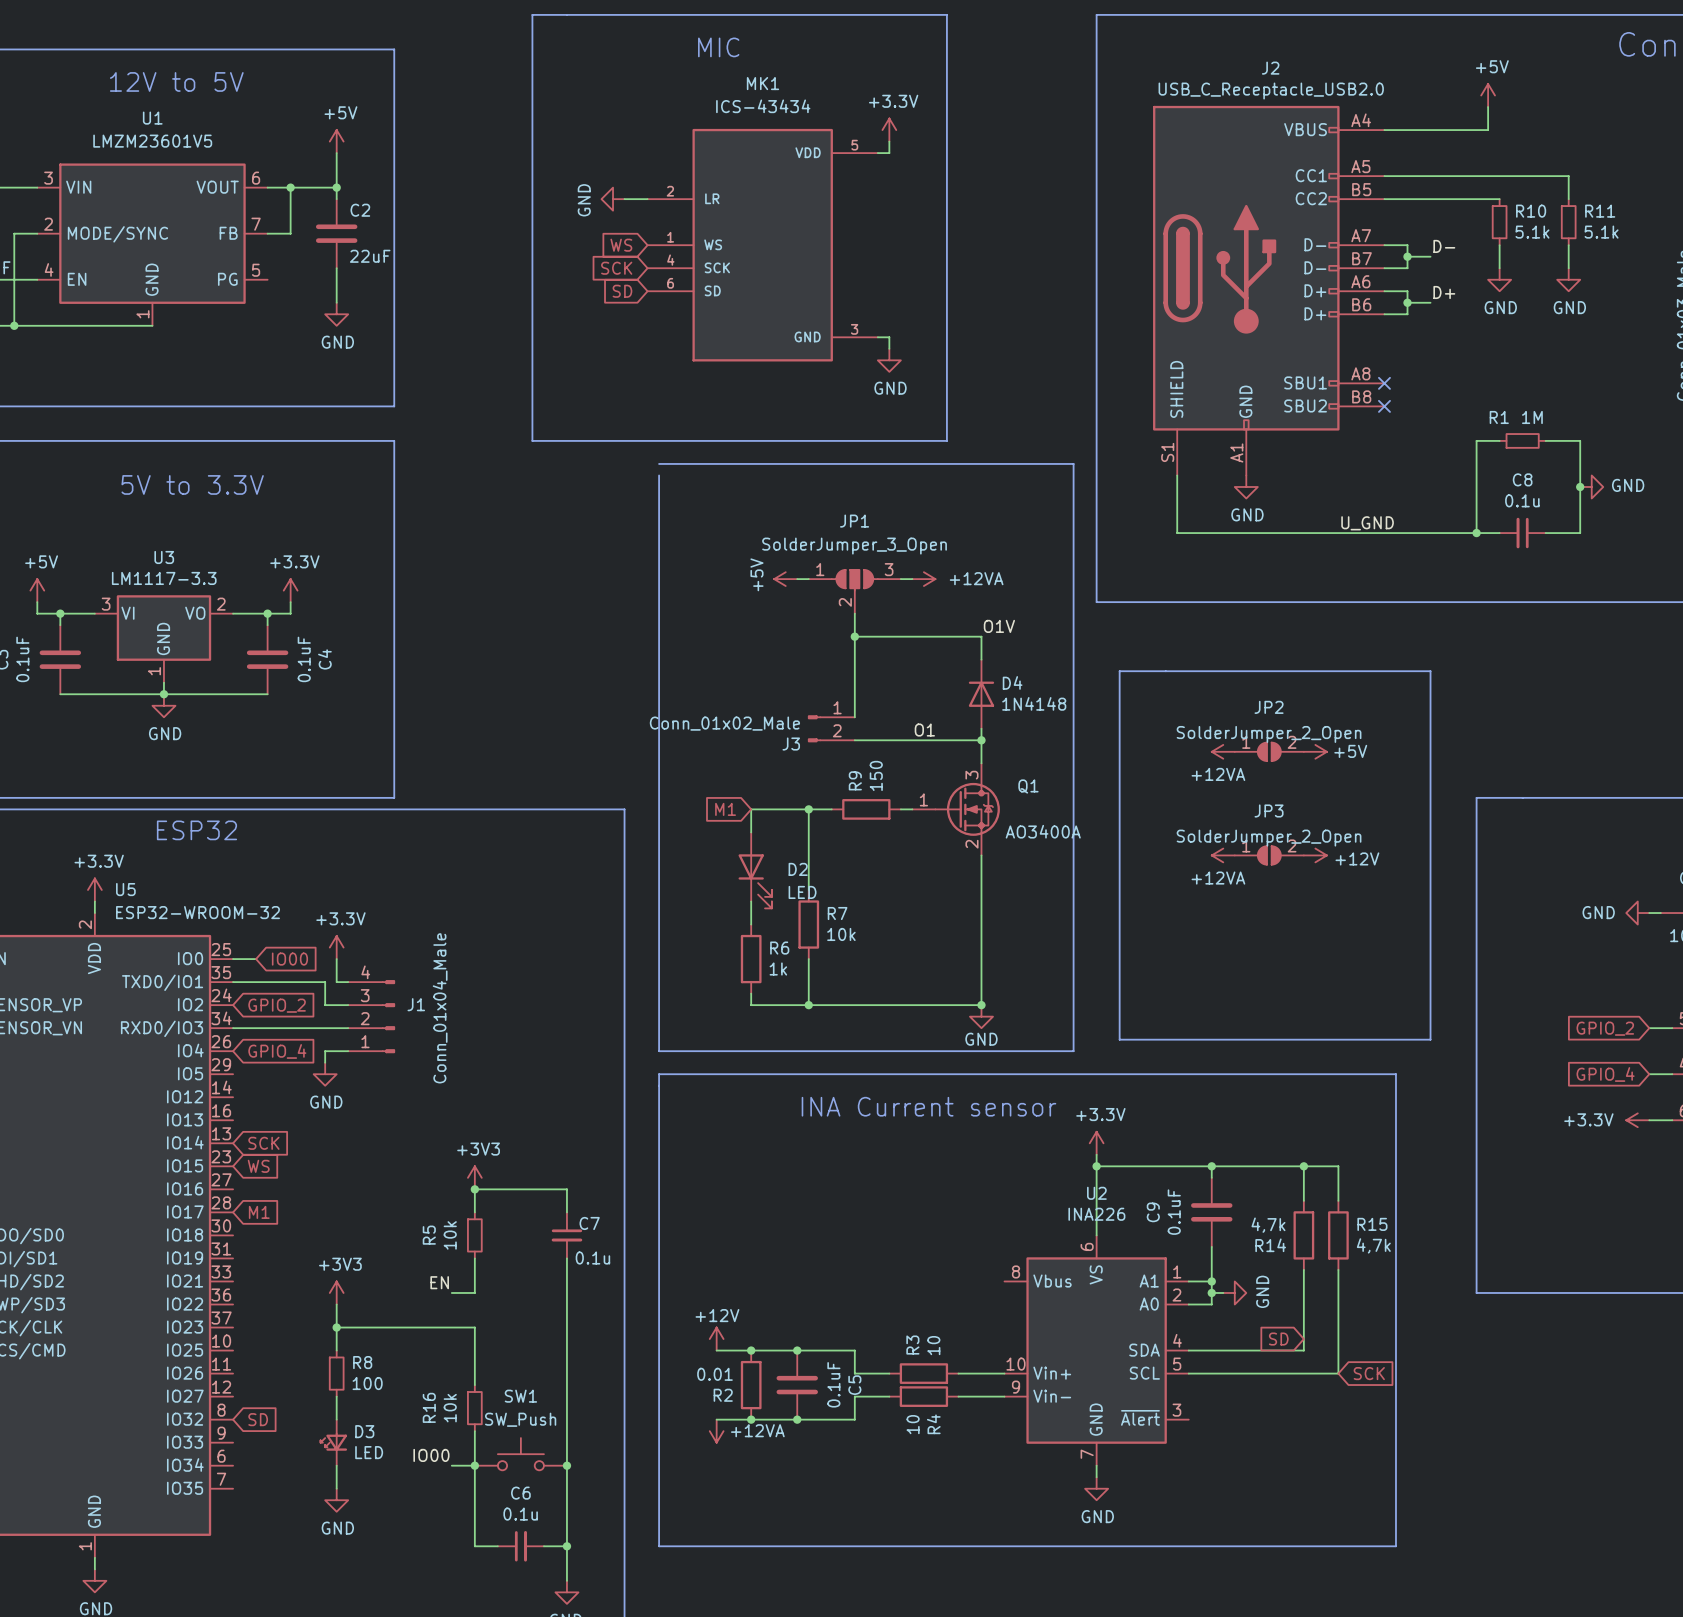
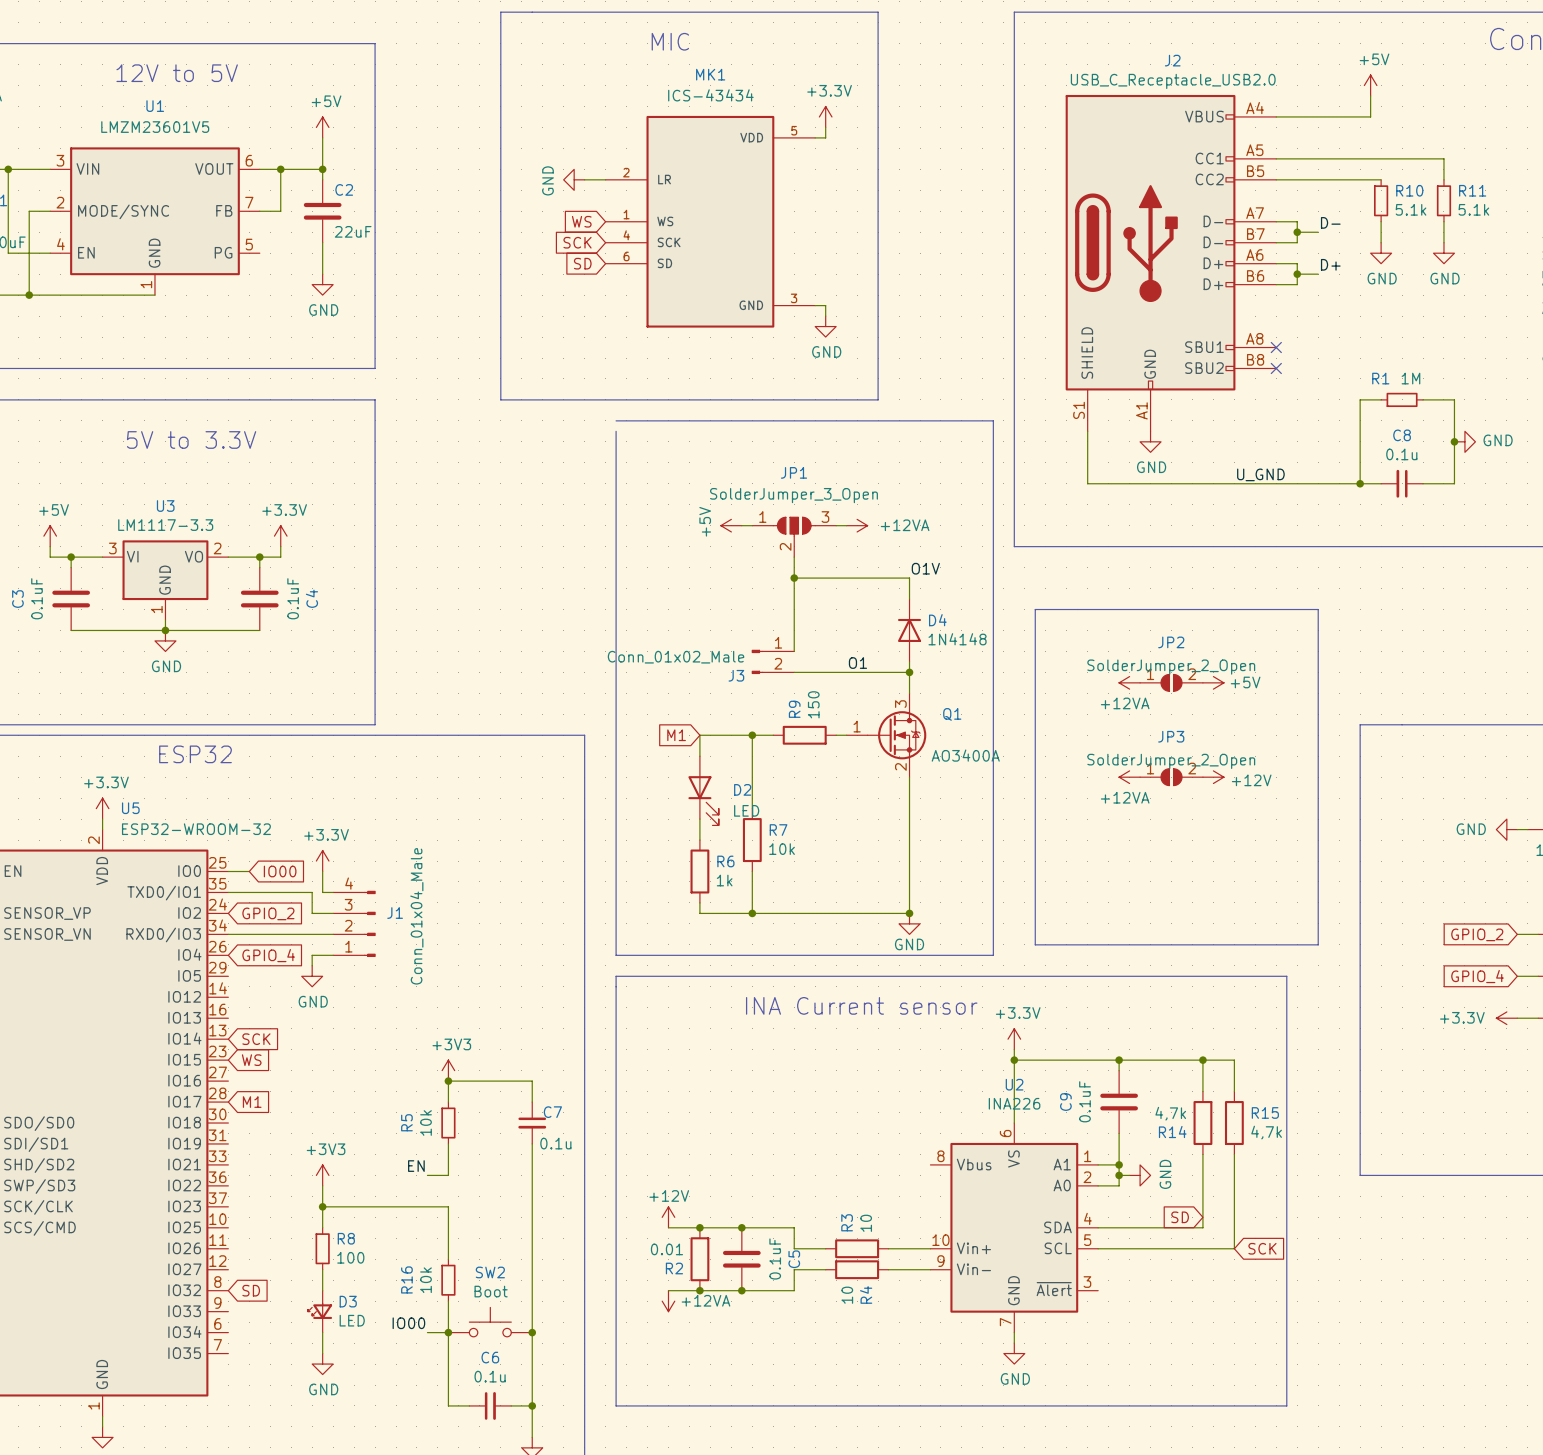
SW1 name: SW1 (520, 1396) -> SW2 (490, 1272)
SW1 value: SW_Push (520, 1419) -> Boot (491, 1291)

